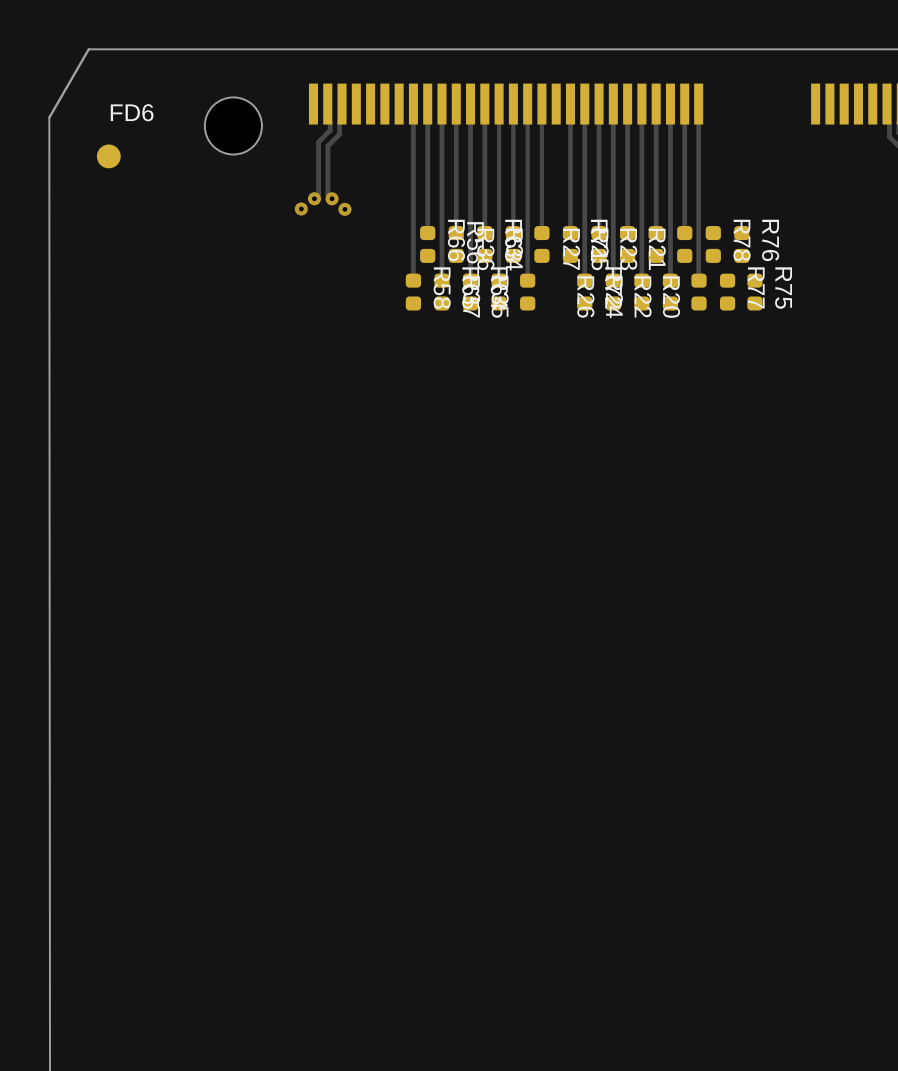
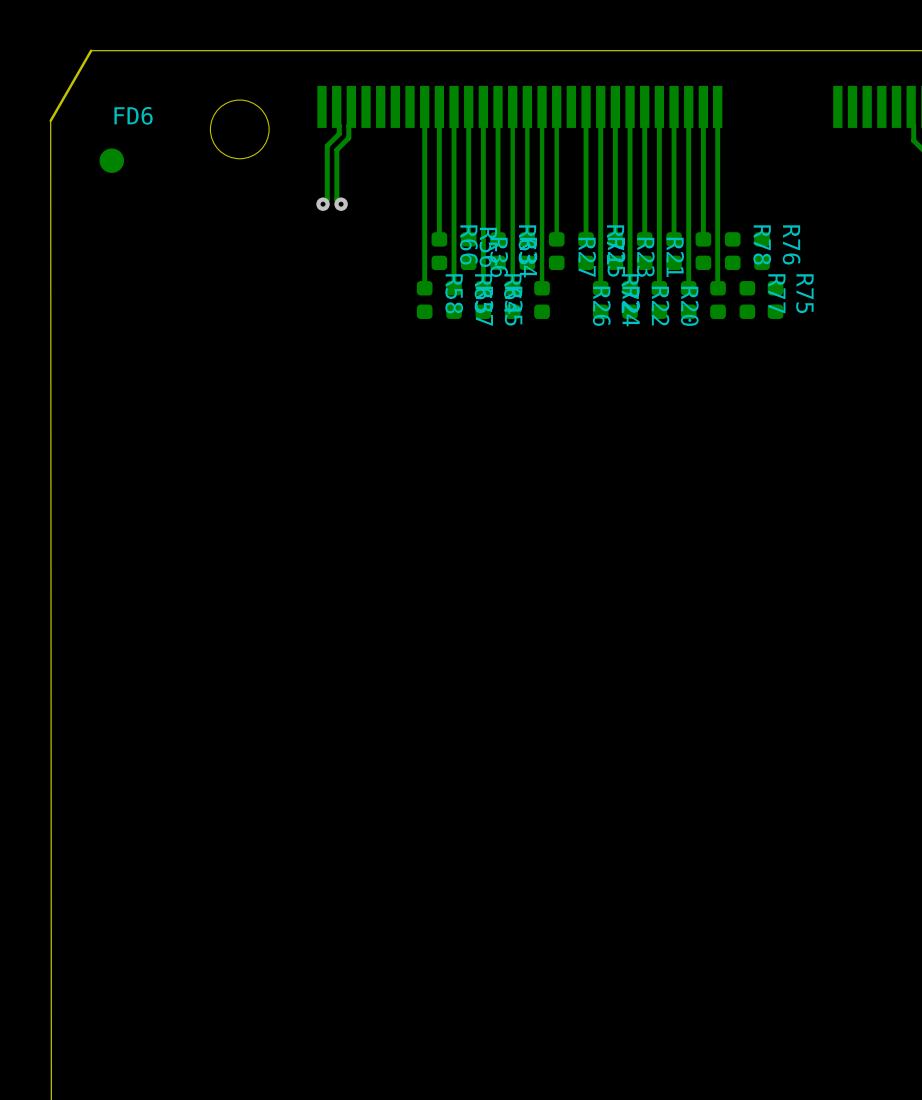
via: (301, 208) -> none
via: (344, 209) -> none

